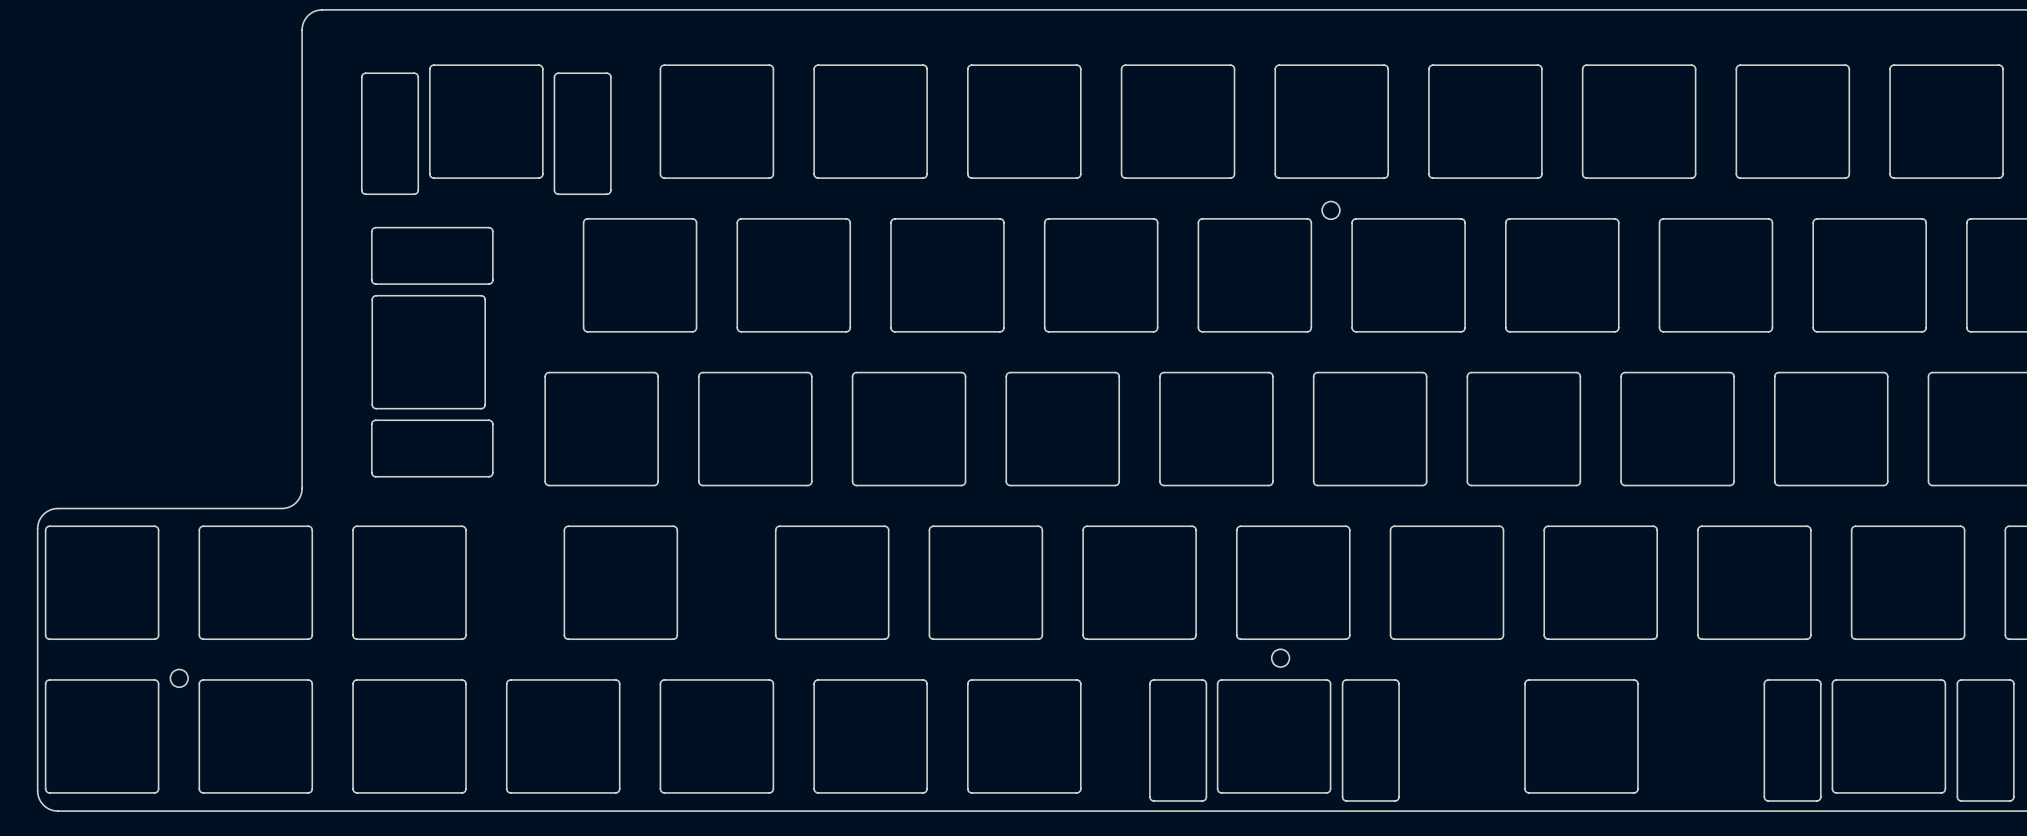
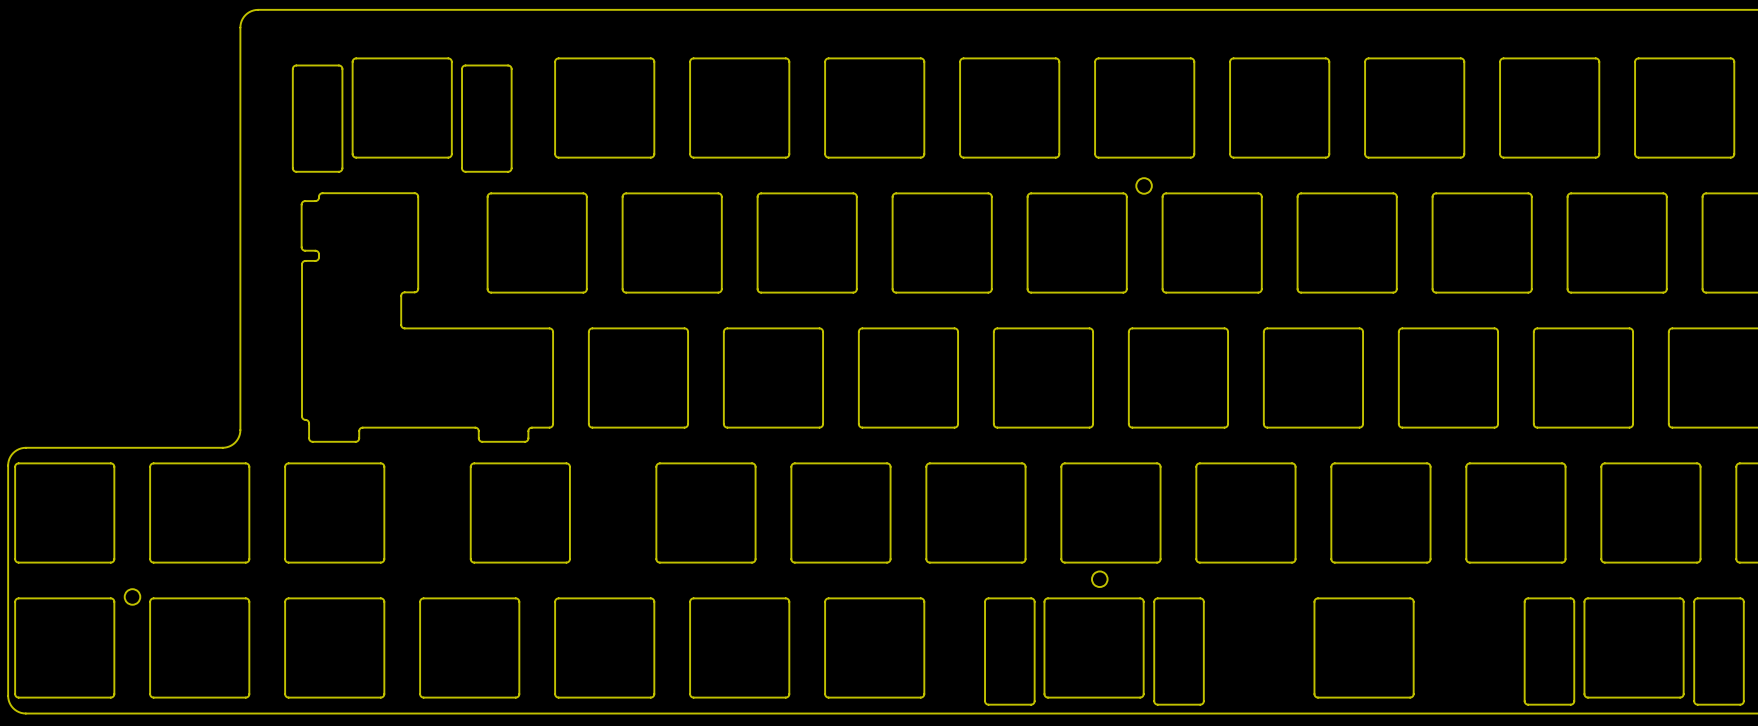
board edge: (387, 227) (490, 228) (492, 231) (492, 281) (488, 284) (375, 284) (371, 280) -> (302, 264) (304, 261) (317, 260) (318, 254) (316, 251) (304, 250) (301, 247)
board edge: (372, 299) (376, 295) (482, 295) (485, 299) (485, 335) -> (315, 201) (322, 193) (417, 194) (418, 289) (415, 292) (403, 292) (401, 295)
board edge: (485, 368) (485, 405) (482, 408) (376, 408) (372, 404) -> (553, 424) (549, 427) (530, 428) (528, 439) (525, 441) (481, 441) (478, 439) (478, 429) (475, 427) (362, 427) (359, 429) (359, 439) (356, 441) (311, 441) (309, 438) (308, 422) (302, 416) (302, 356)
board edge: (658, 376) (654, 372) (549, 372) (545, 376) (546, 484) (654, 485) (658, 481) -> (553, 331) (549, 328) (404, 328) (401, 324)
board edge: (488, 420) (374, 420) (371, 424) (372, 474) (375, 476) (490, 476) (492, 472) (492, 424) (488, 420) -> none

